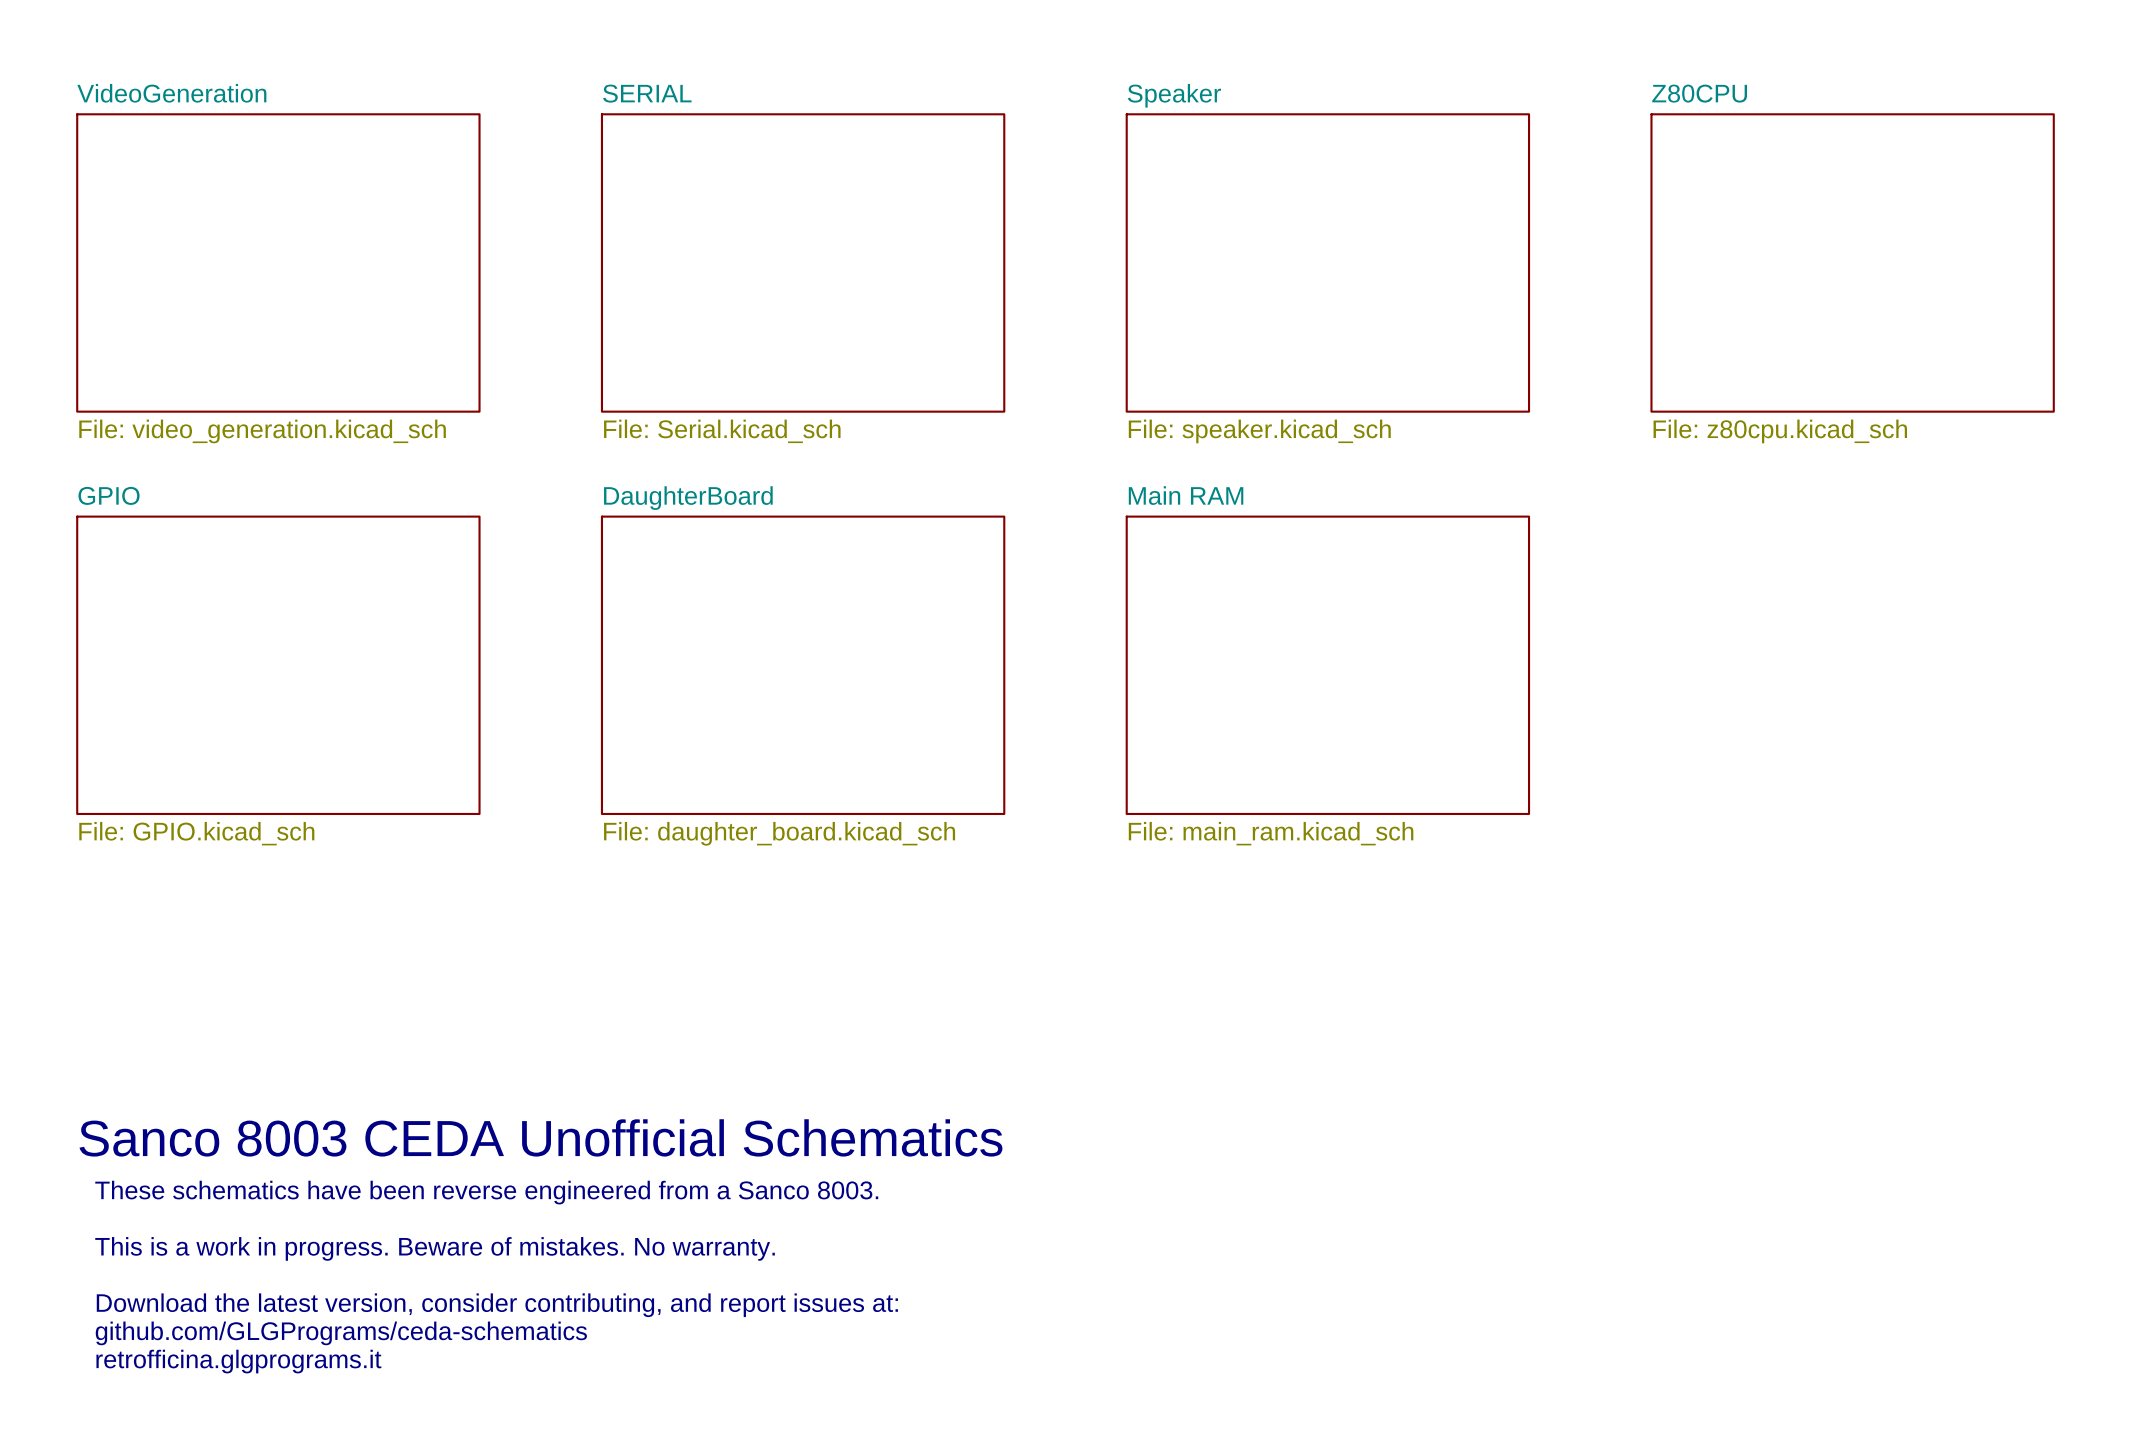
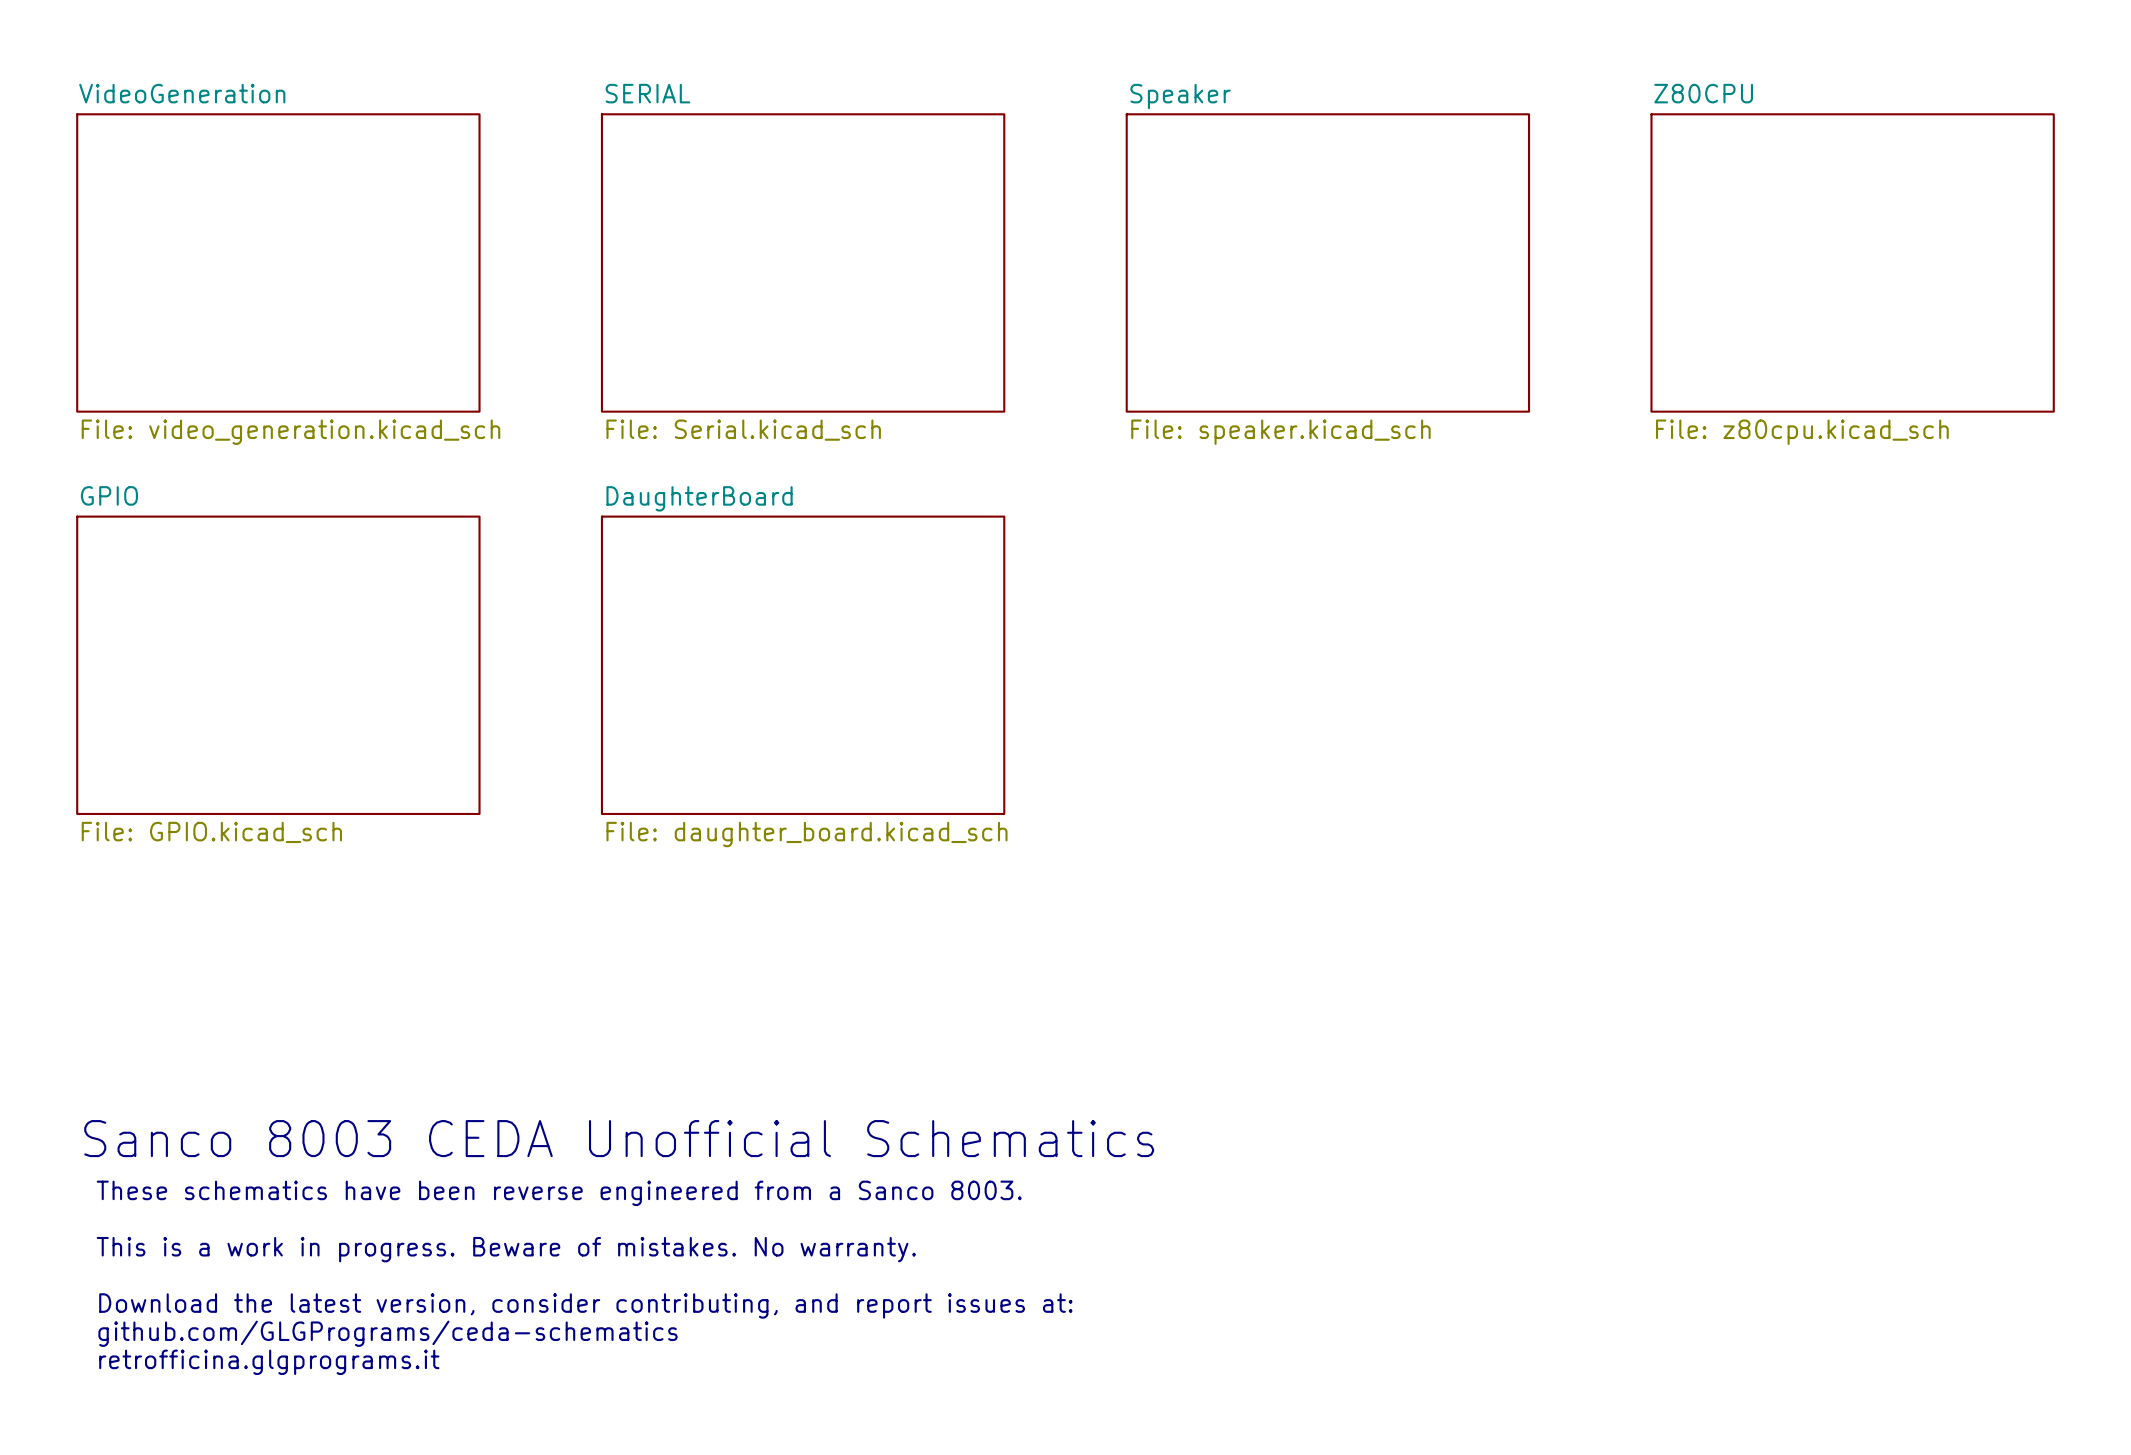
sheet Main RAM: File: main_ram.kicad_sch (1327, 665) -> none

